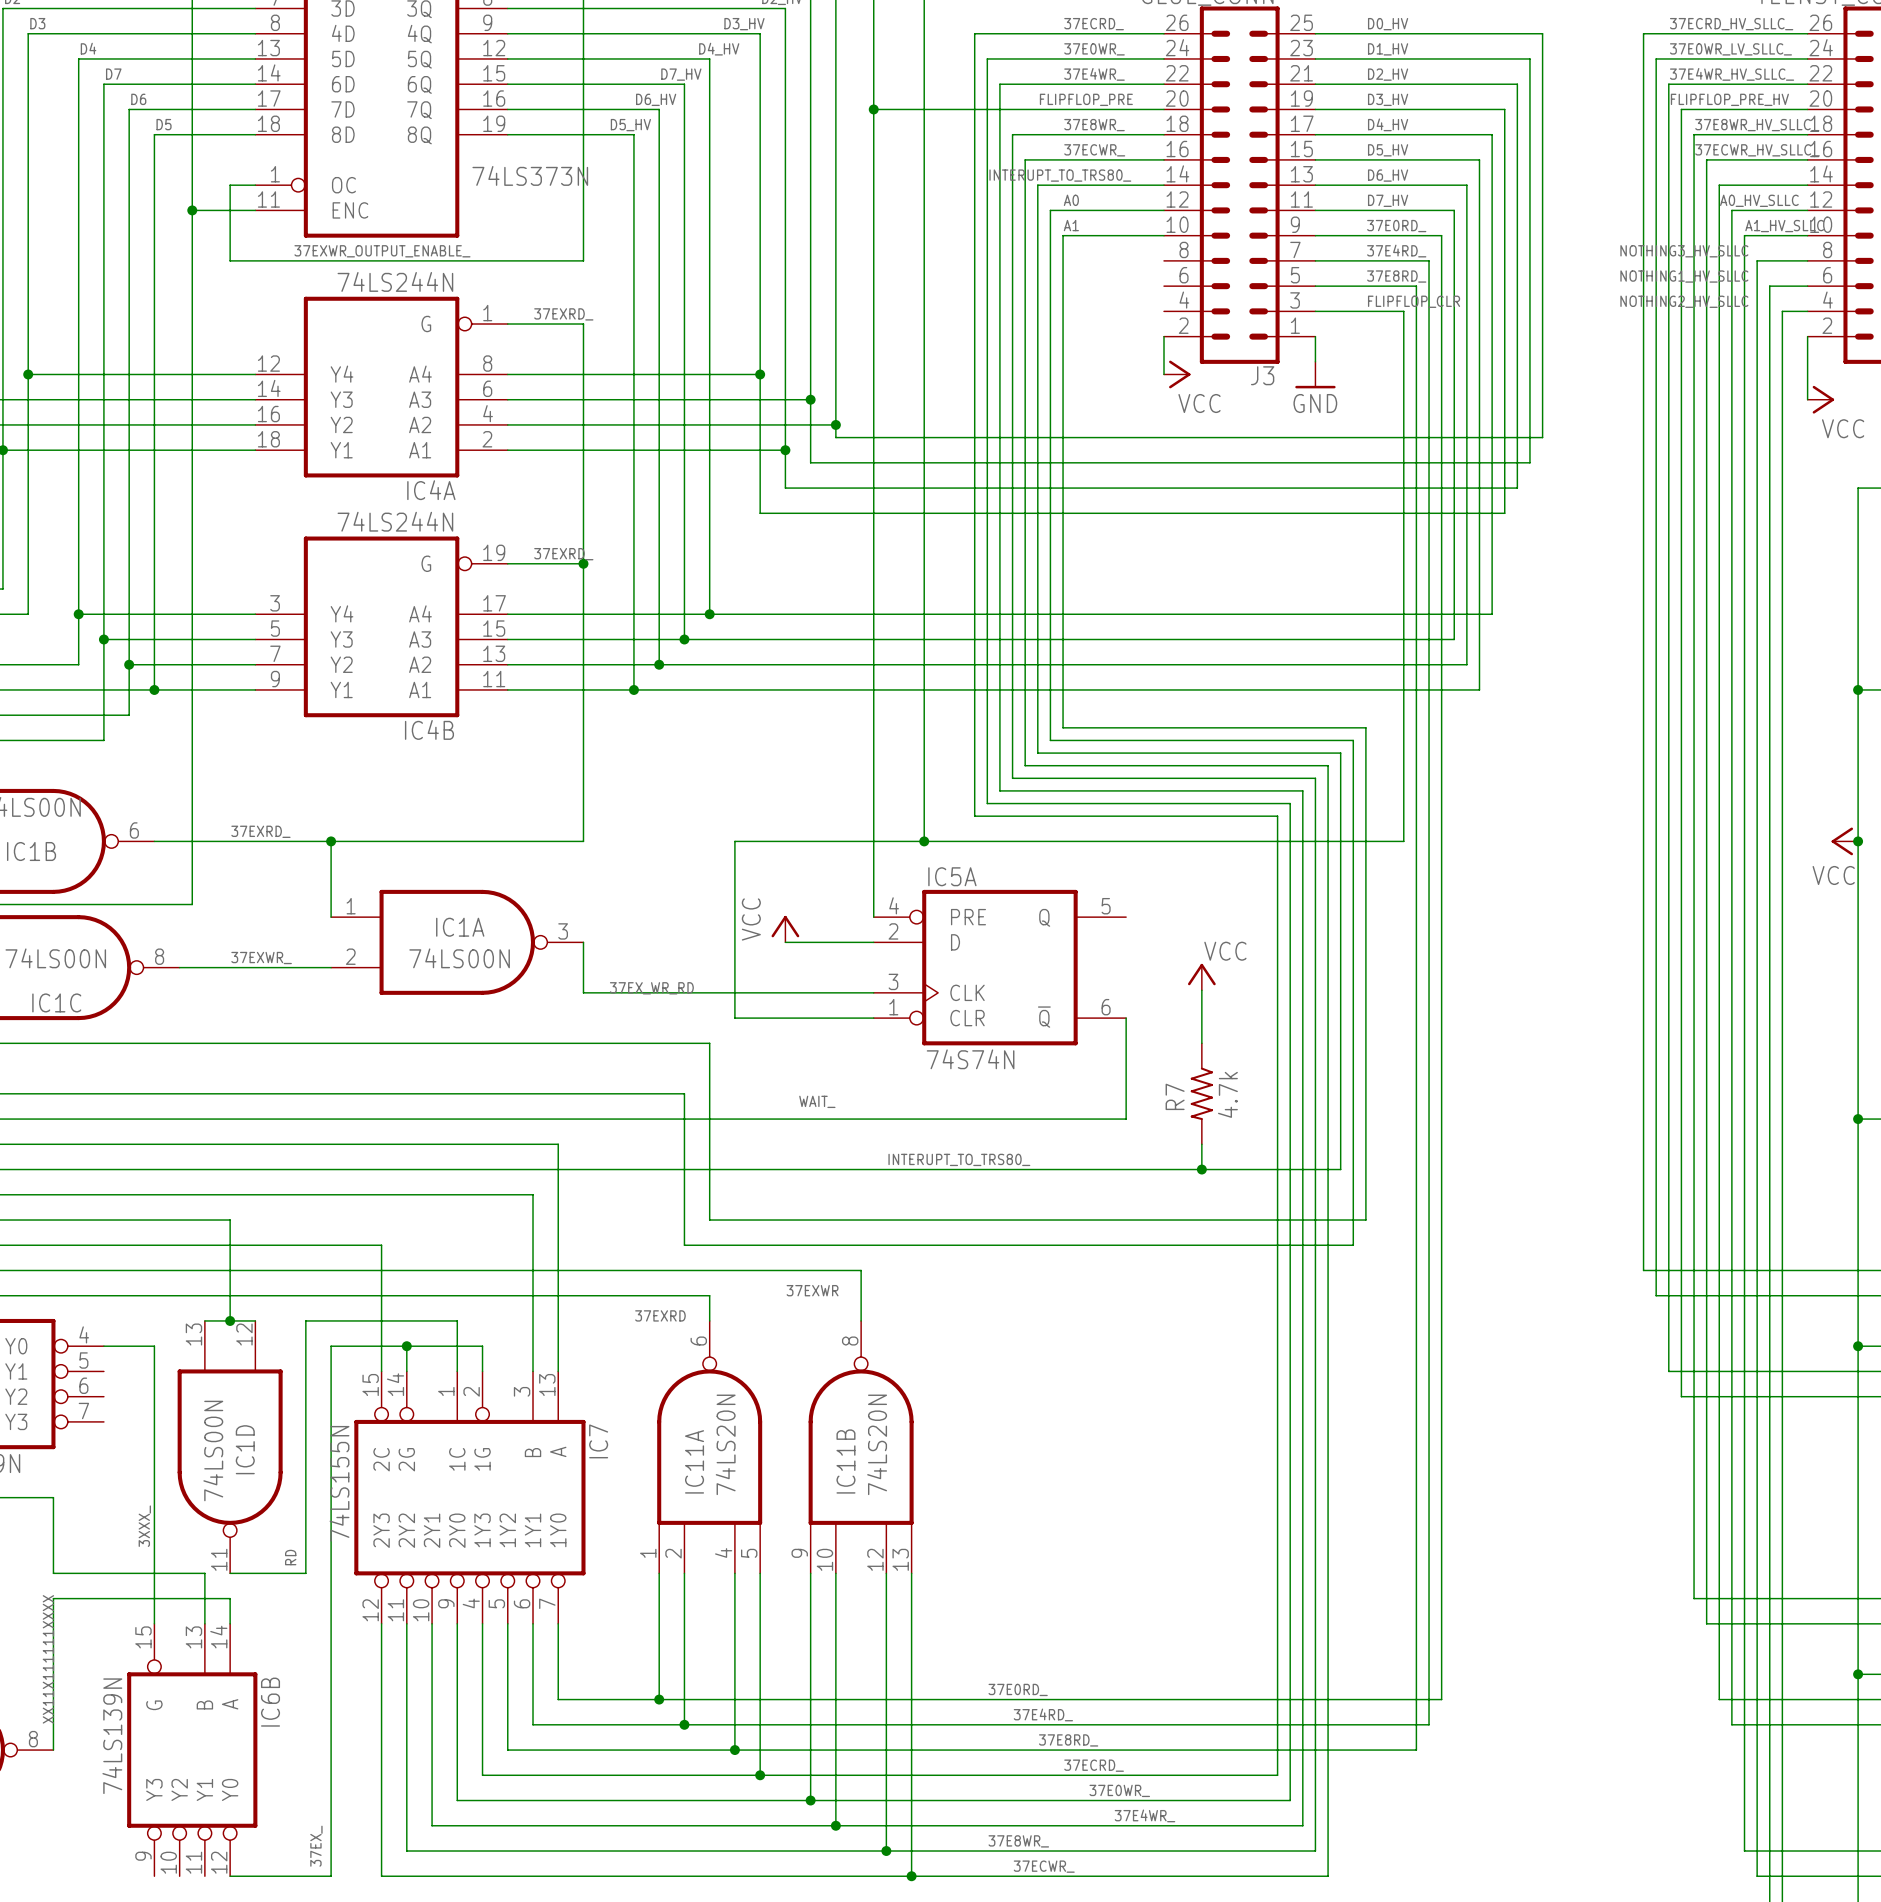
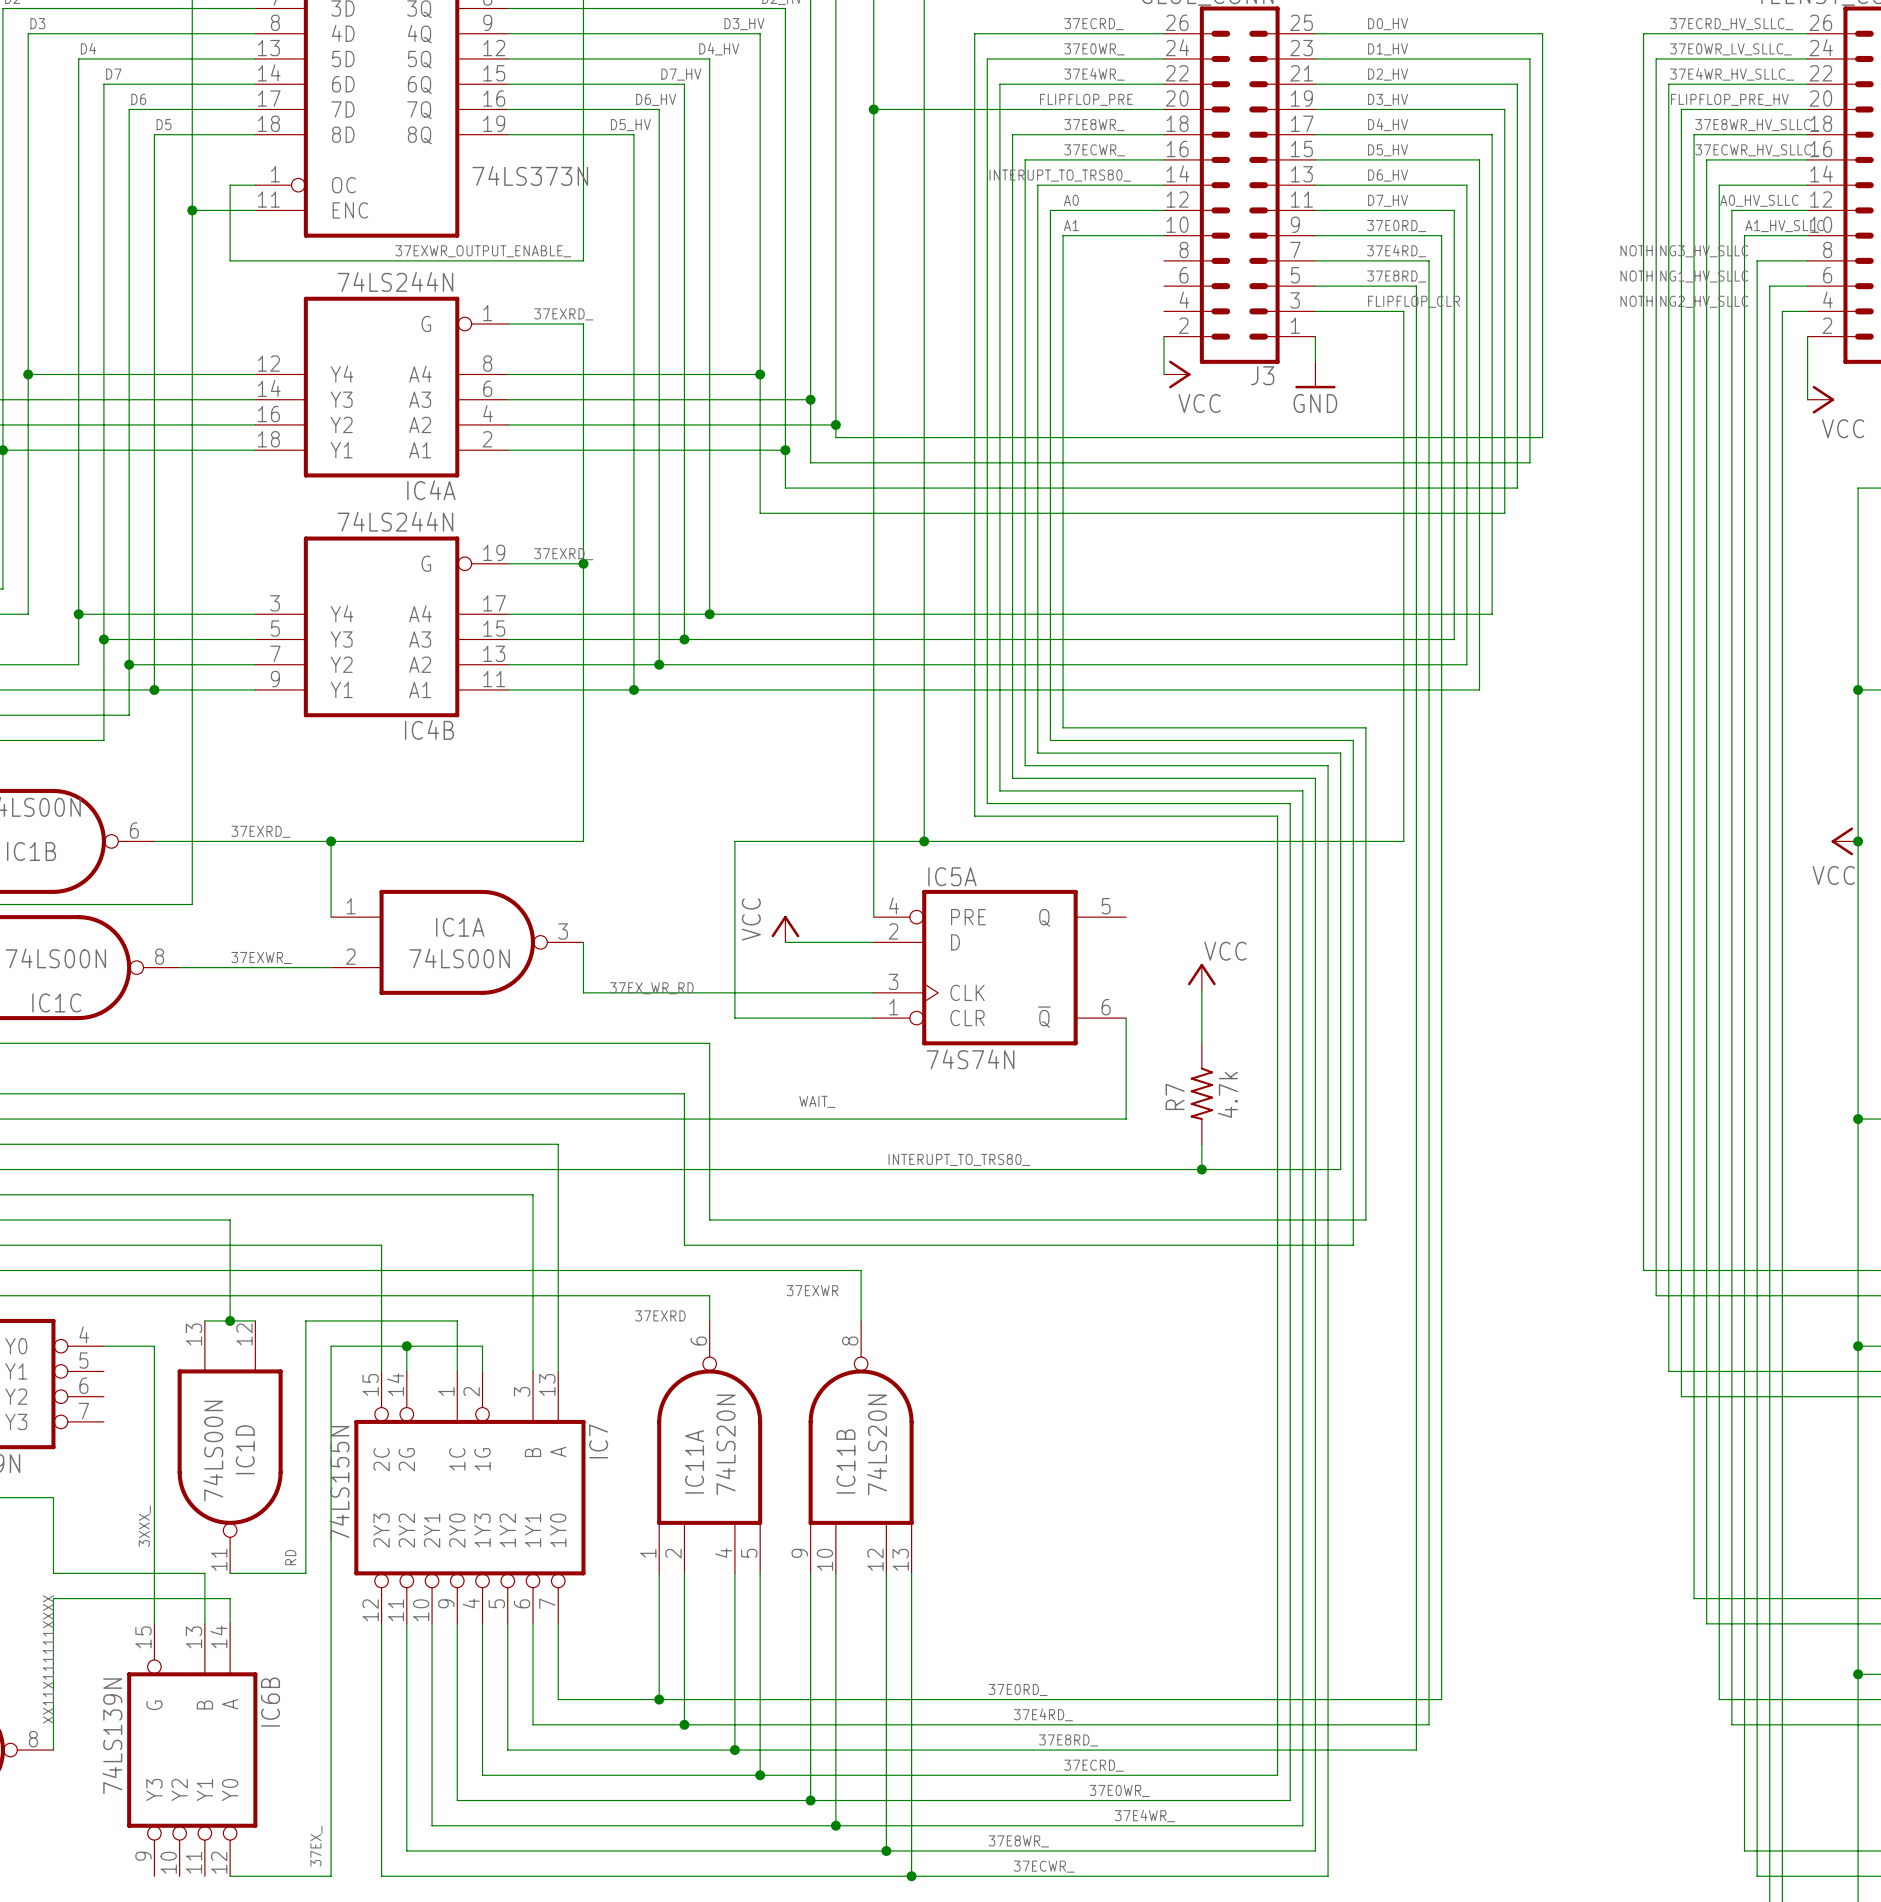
label position: 37EXWR_OUTPUT_ENABLE_ (382, 251) -> 37EXWR_OUTPUT_ENABLE_ (483, 251)

